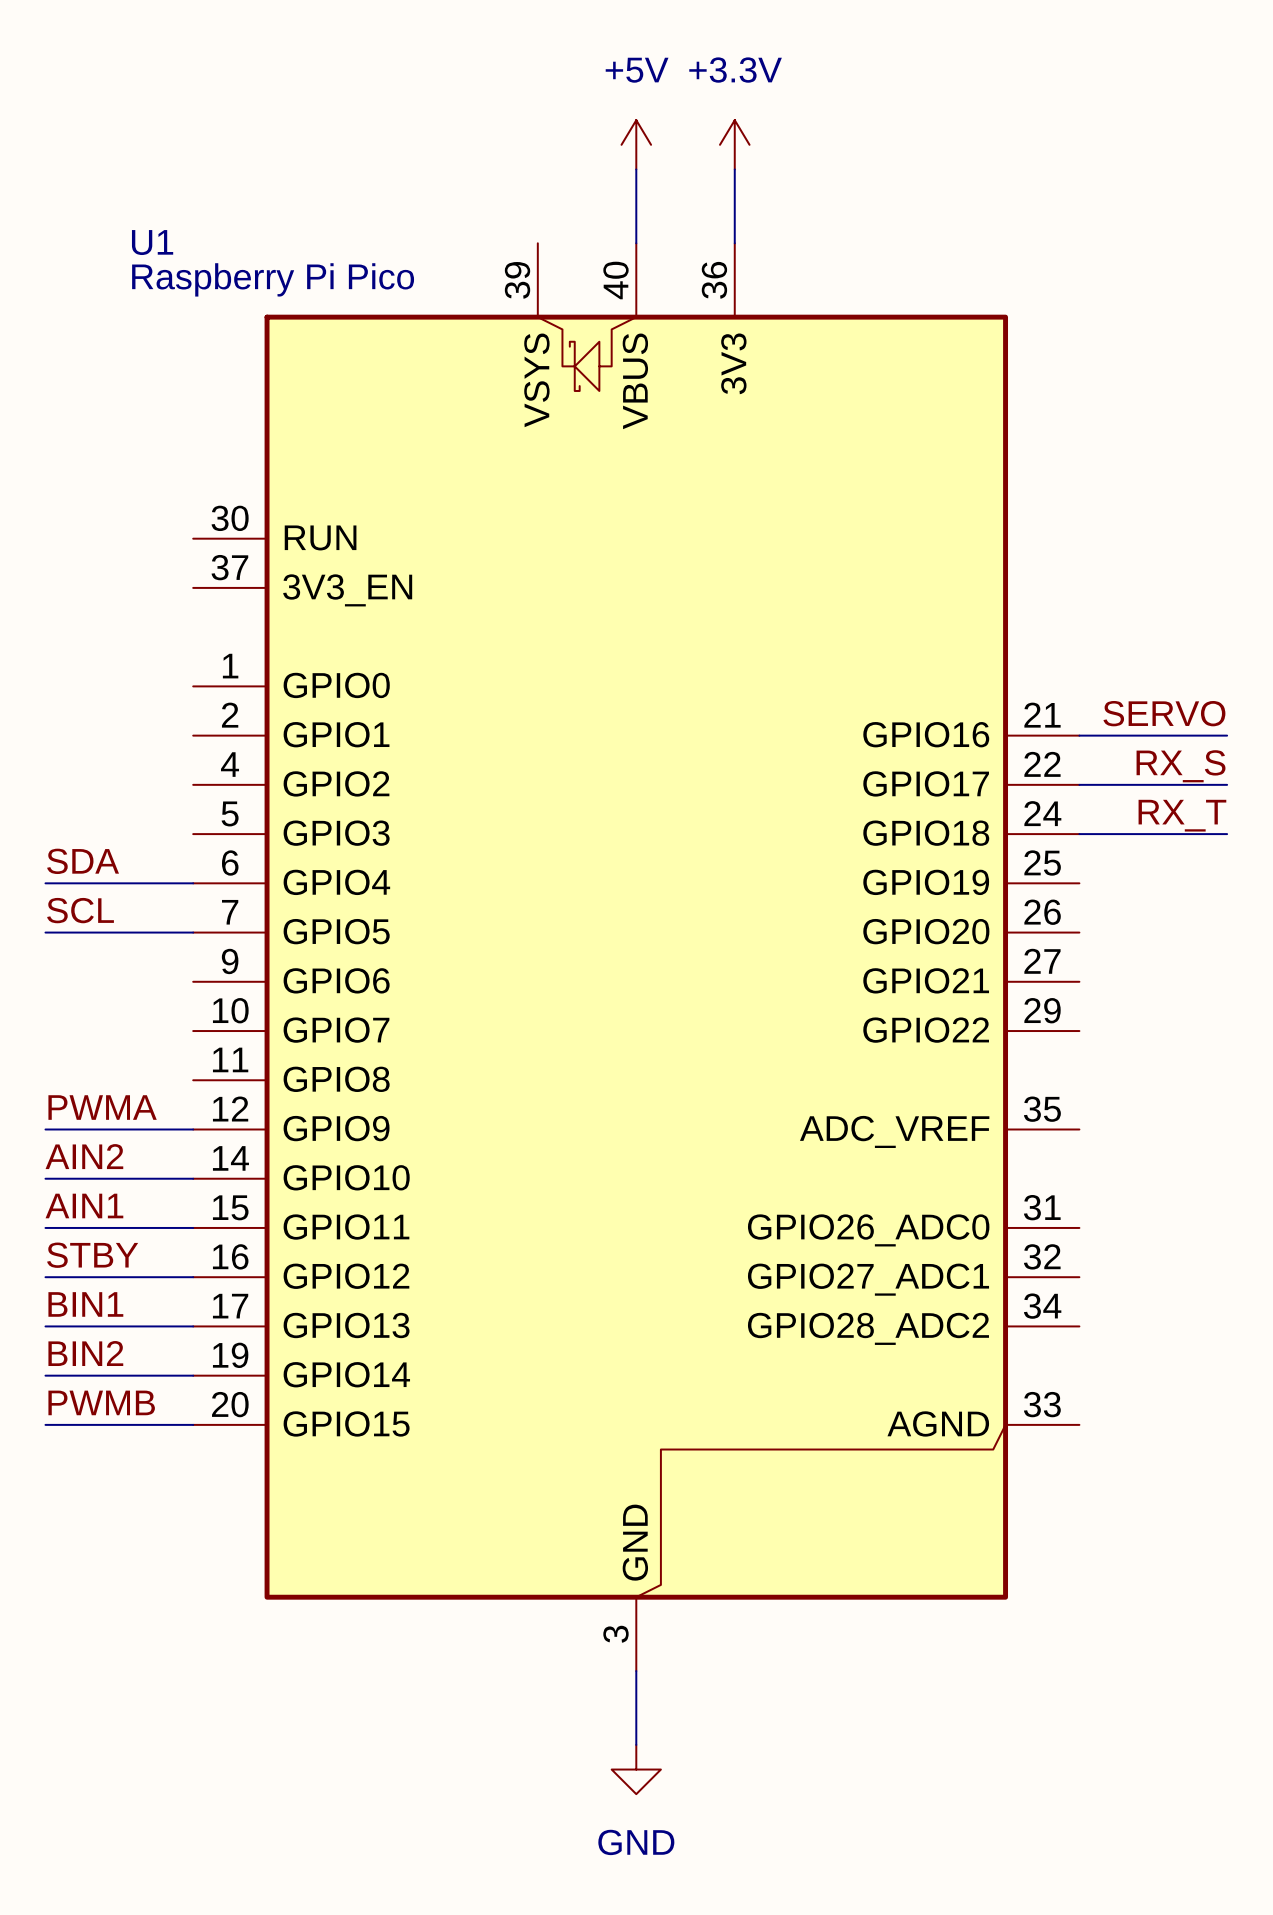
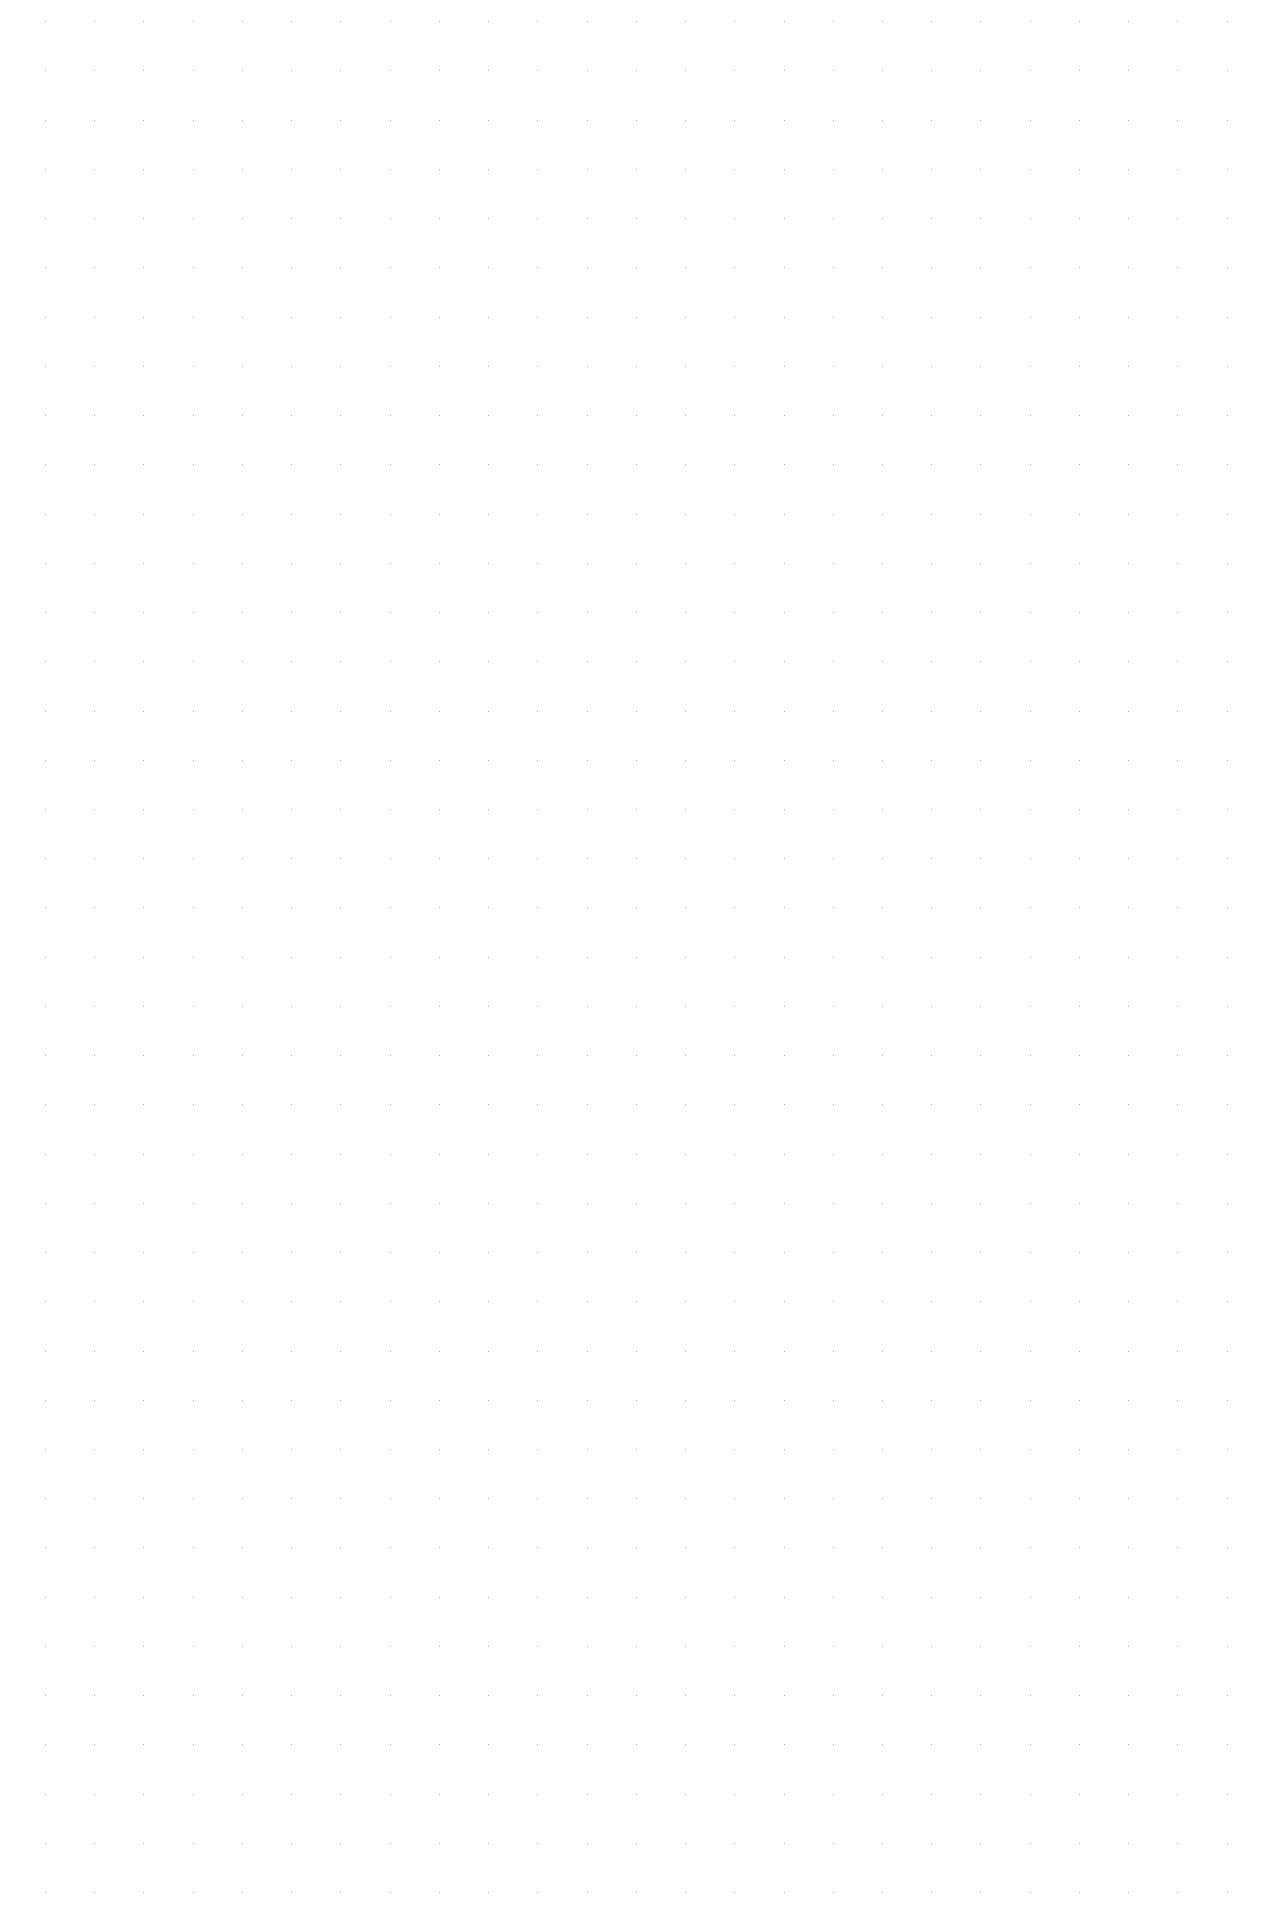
power symbol: +5V (636, 144) -> none
power symbol: +3.3V (734, 144) -> none
wire: (636, 169) (636, 243) -> none
wire: (734, 169) (734, 243) -> none
label: SERVO (1164, 713) -> none
wire: (1079, 735) (1227, 735) -> none
label: RX_S (1181, 766) -> none
wire: (1079, 784) (1227, 784) -> none
label: RX_T (1182, 815) -> none
wire: (1079, 834) (1227, 834) -> none
label: SDA (83, 861) -> none
wire: (45, 883) (193, 883) -> none
label: SCL (80, 910) -> none
wire: (45, 932) (193, 932) -> none
U1: Raspberry Pi Pico (636, 957) -> none
label: PWMA (102, 1107) -> none
wire: (45, 1129) (193, 1129) -> none
label: AIN2 (84, 1156) -> none
wire: (45, 1178) (193, 1178) -> none
label: AIN1 (84, 1205) -> none
wire: (45, 1227) (193, 1227) -> none
label: STBY (92, 1255) -> none
wire: (45, 1277) (193, 1277) -> none
label: BIN1 (85, 1304) -> none
wire: (45, 1326) (193, 1326) -> none
label: BIN2 (85, 1353) -> none
wire: (45, 1375) (193, 1375) -> none
label: PWMB (101, 1402) -> none
wire: (45, 1424) (193, 1424) -> none
wire: (636, 1671) (636, 1744) -> none
power symbol: GND (636, 1769) -> none

